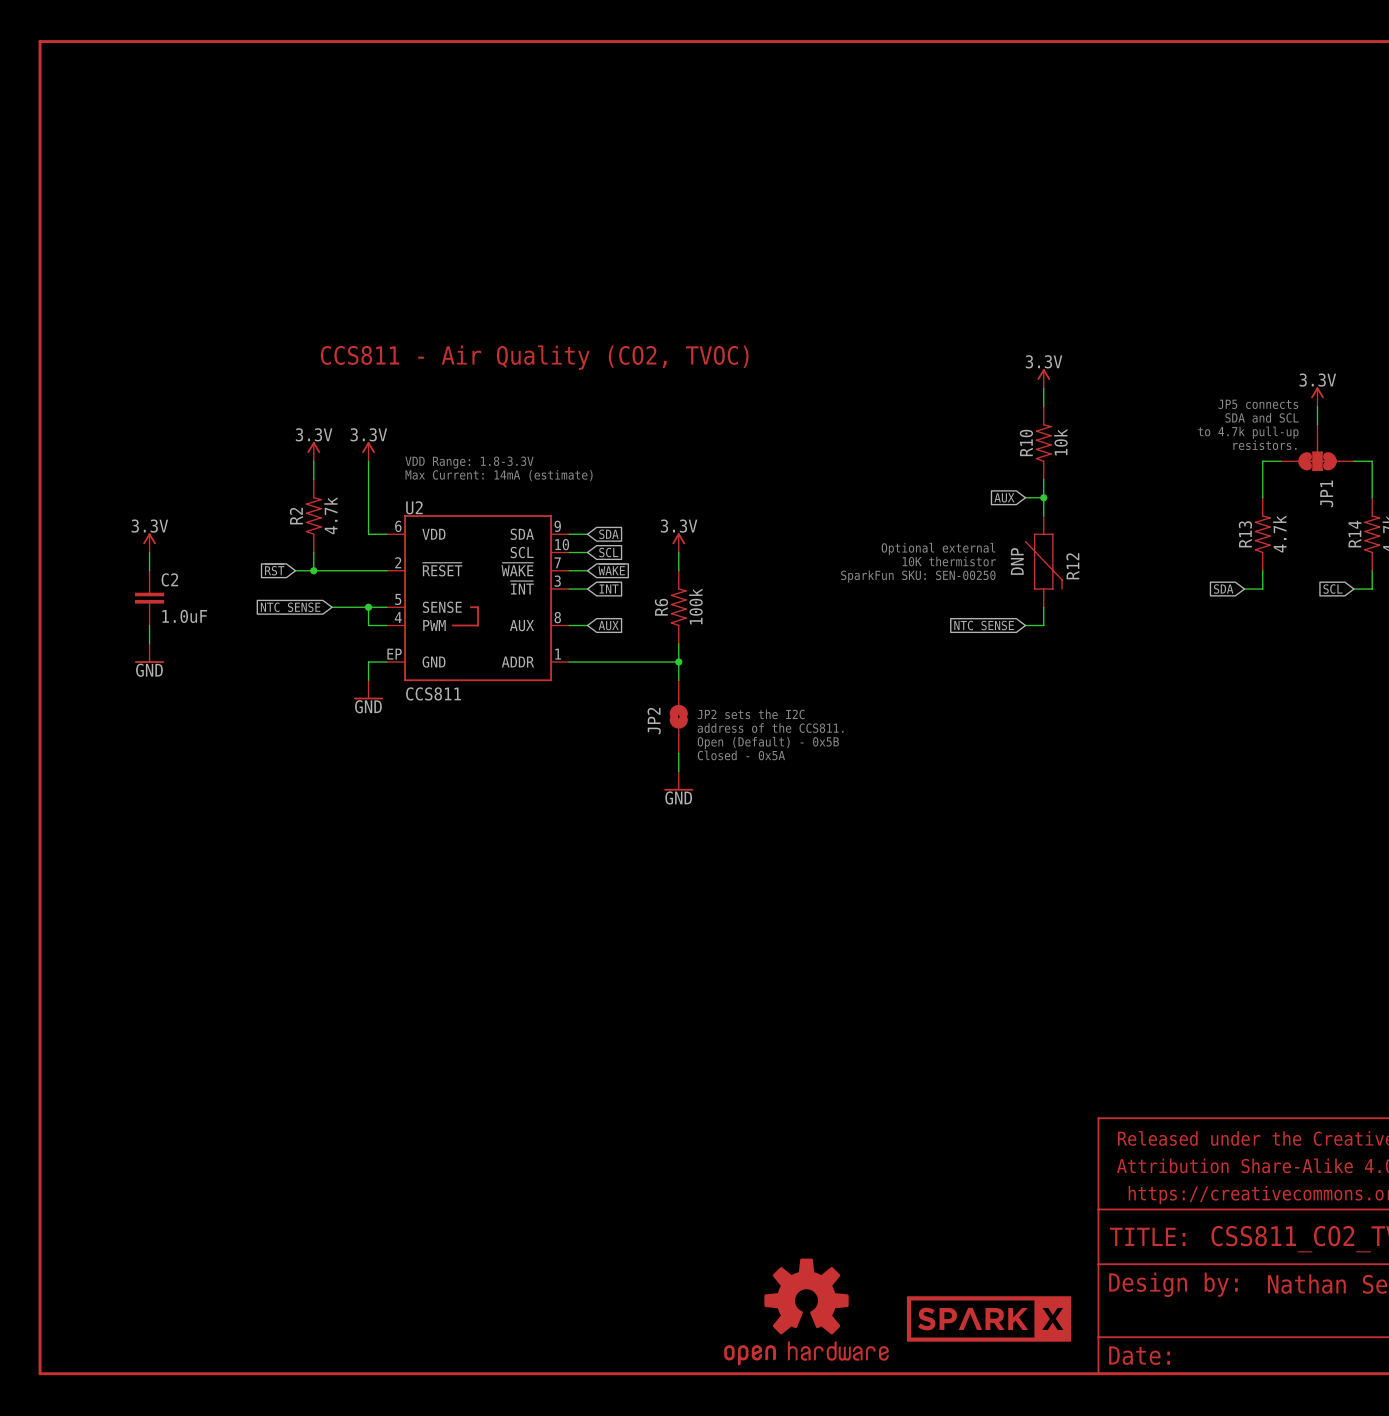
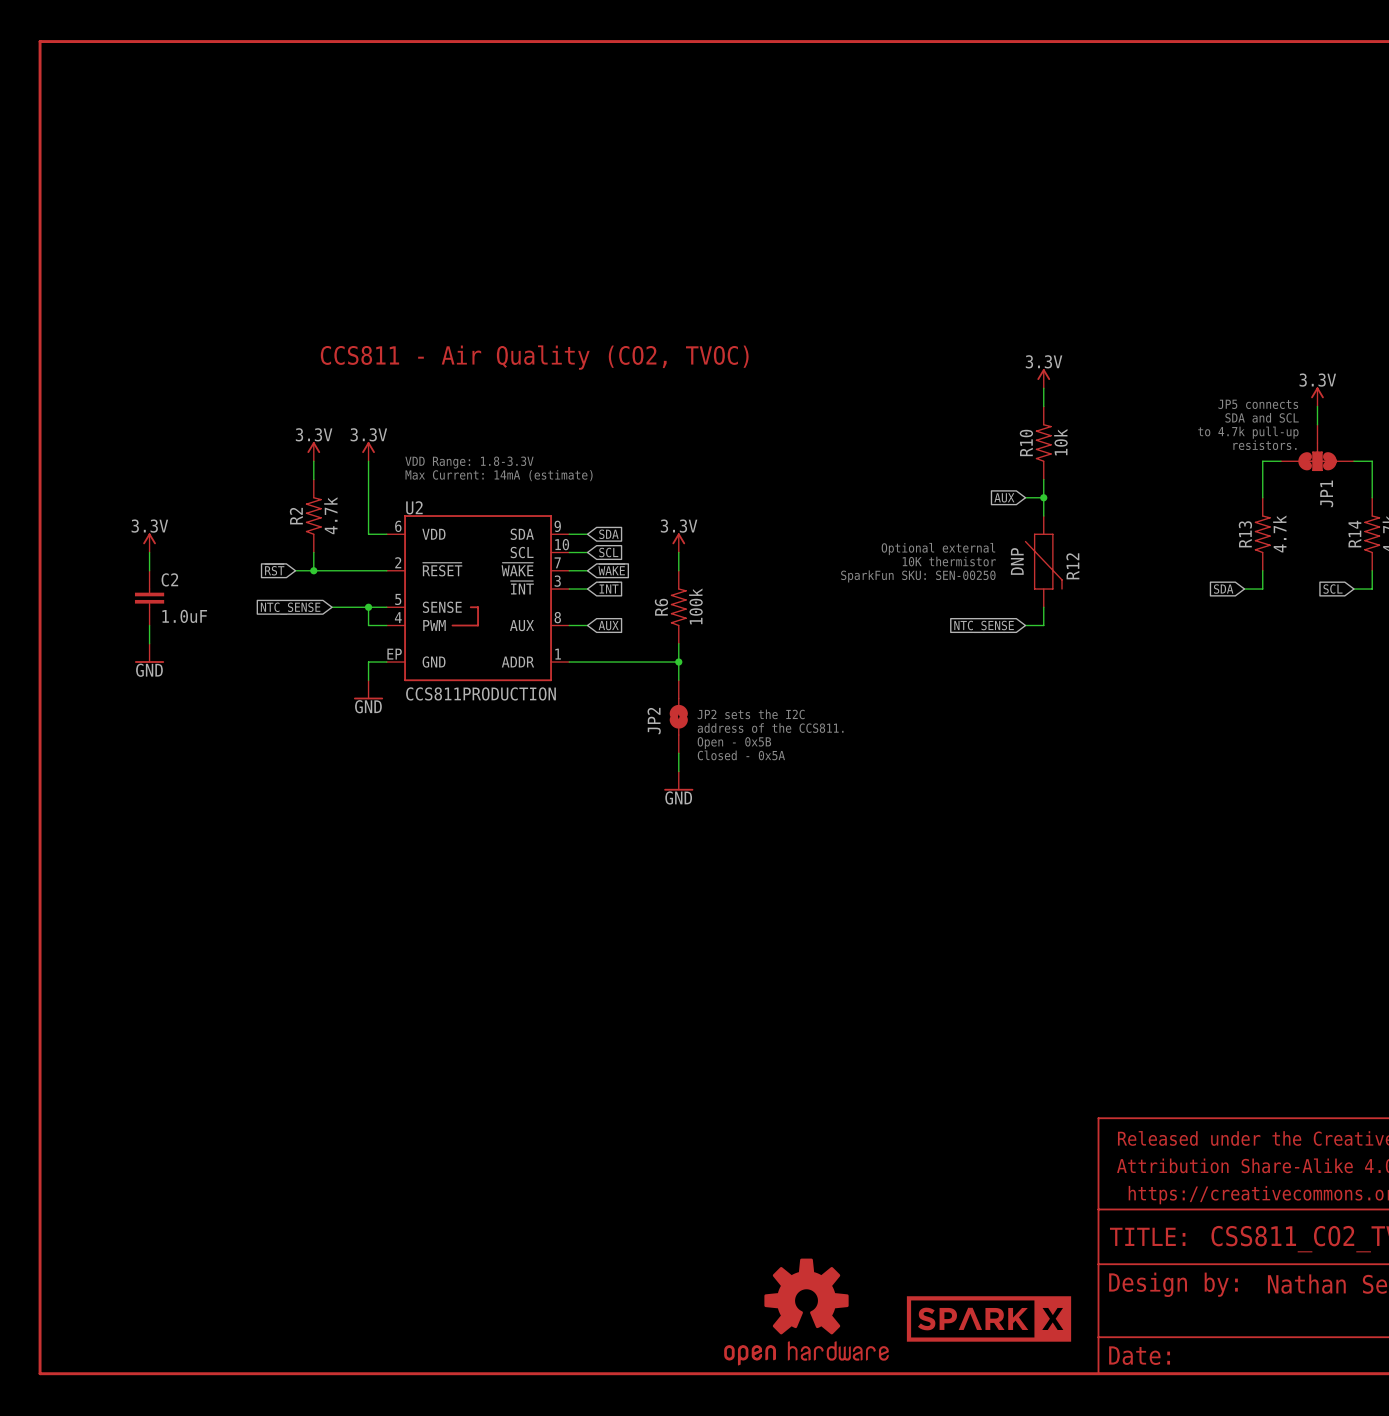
U2 value: CCS811 (433, 693) -> CCS811PRODUCTION (480, 693)
text: Open (Default) - 0x5B (768, 742) -> Open - 0x5B (734, 743)

